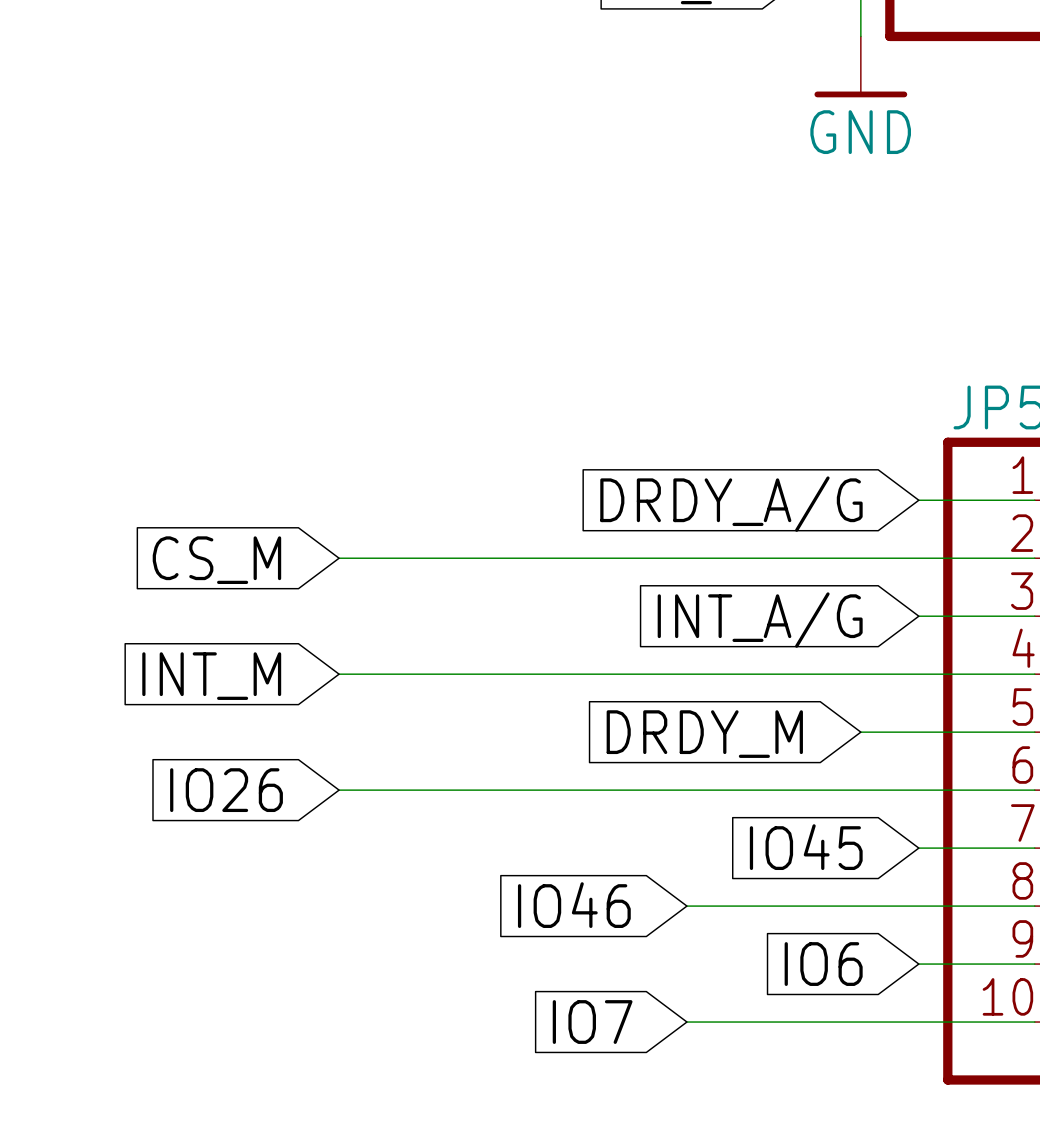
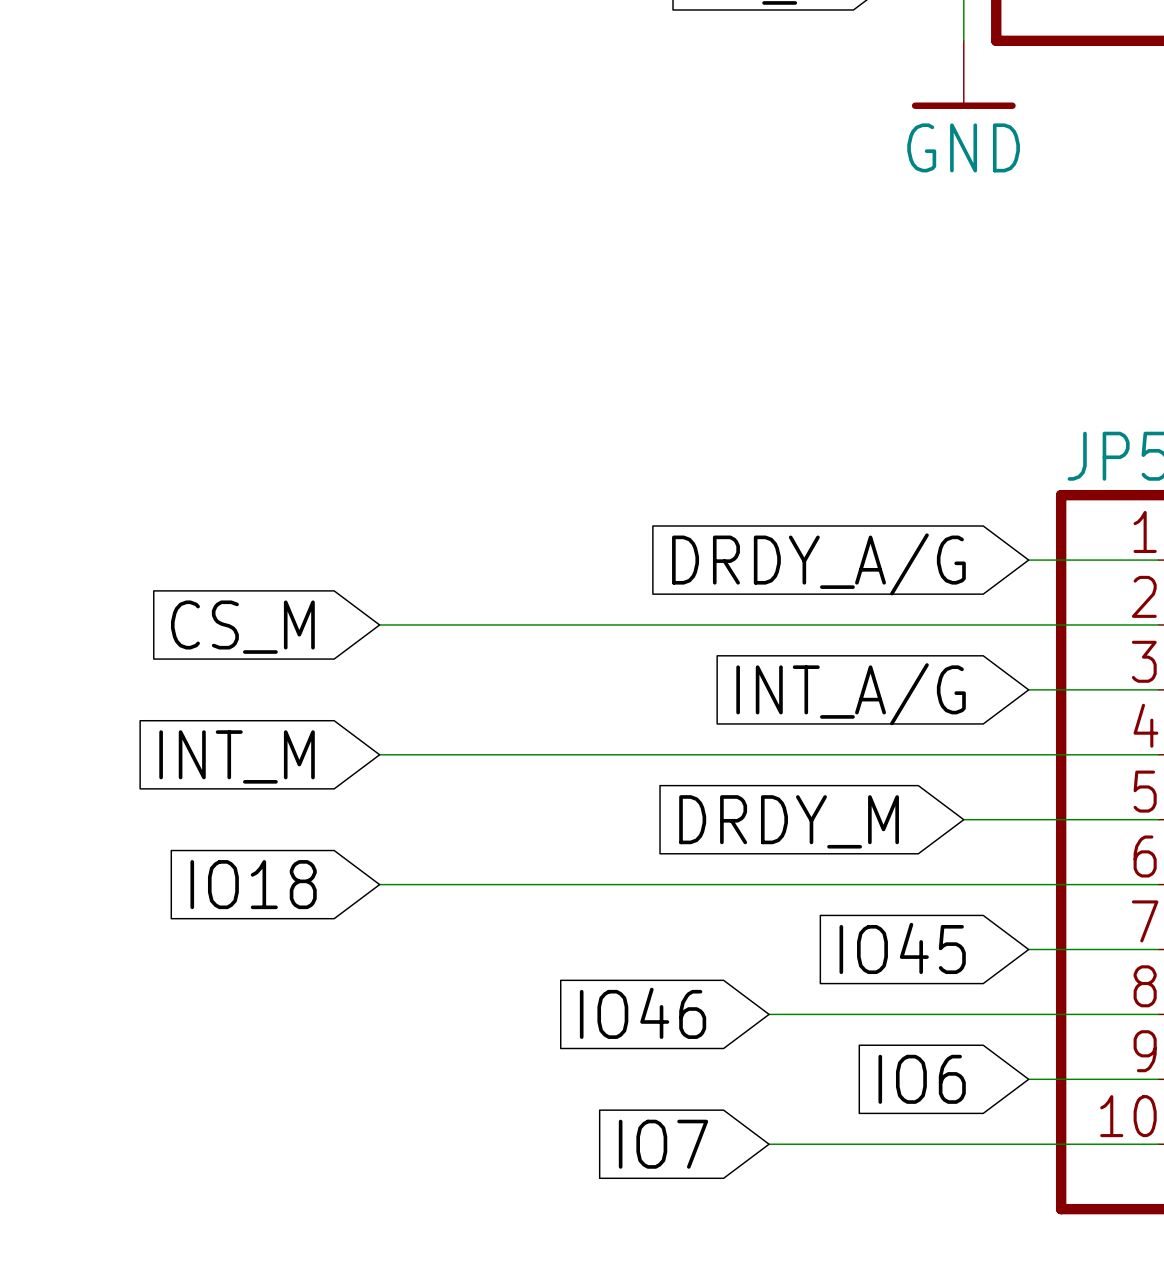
global label: IO26 (226, 790) -> IO18 (253, 884)

